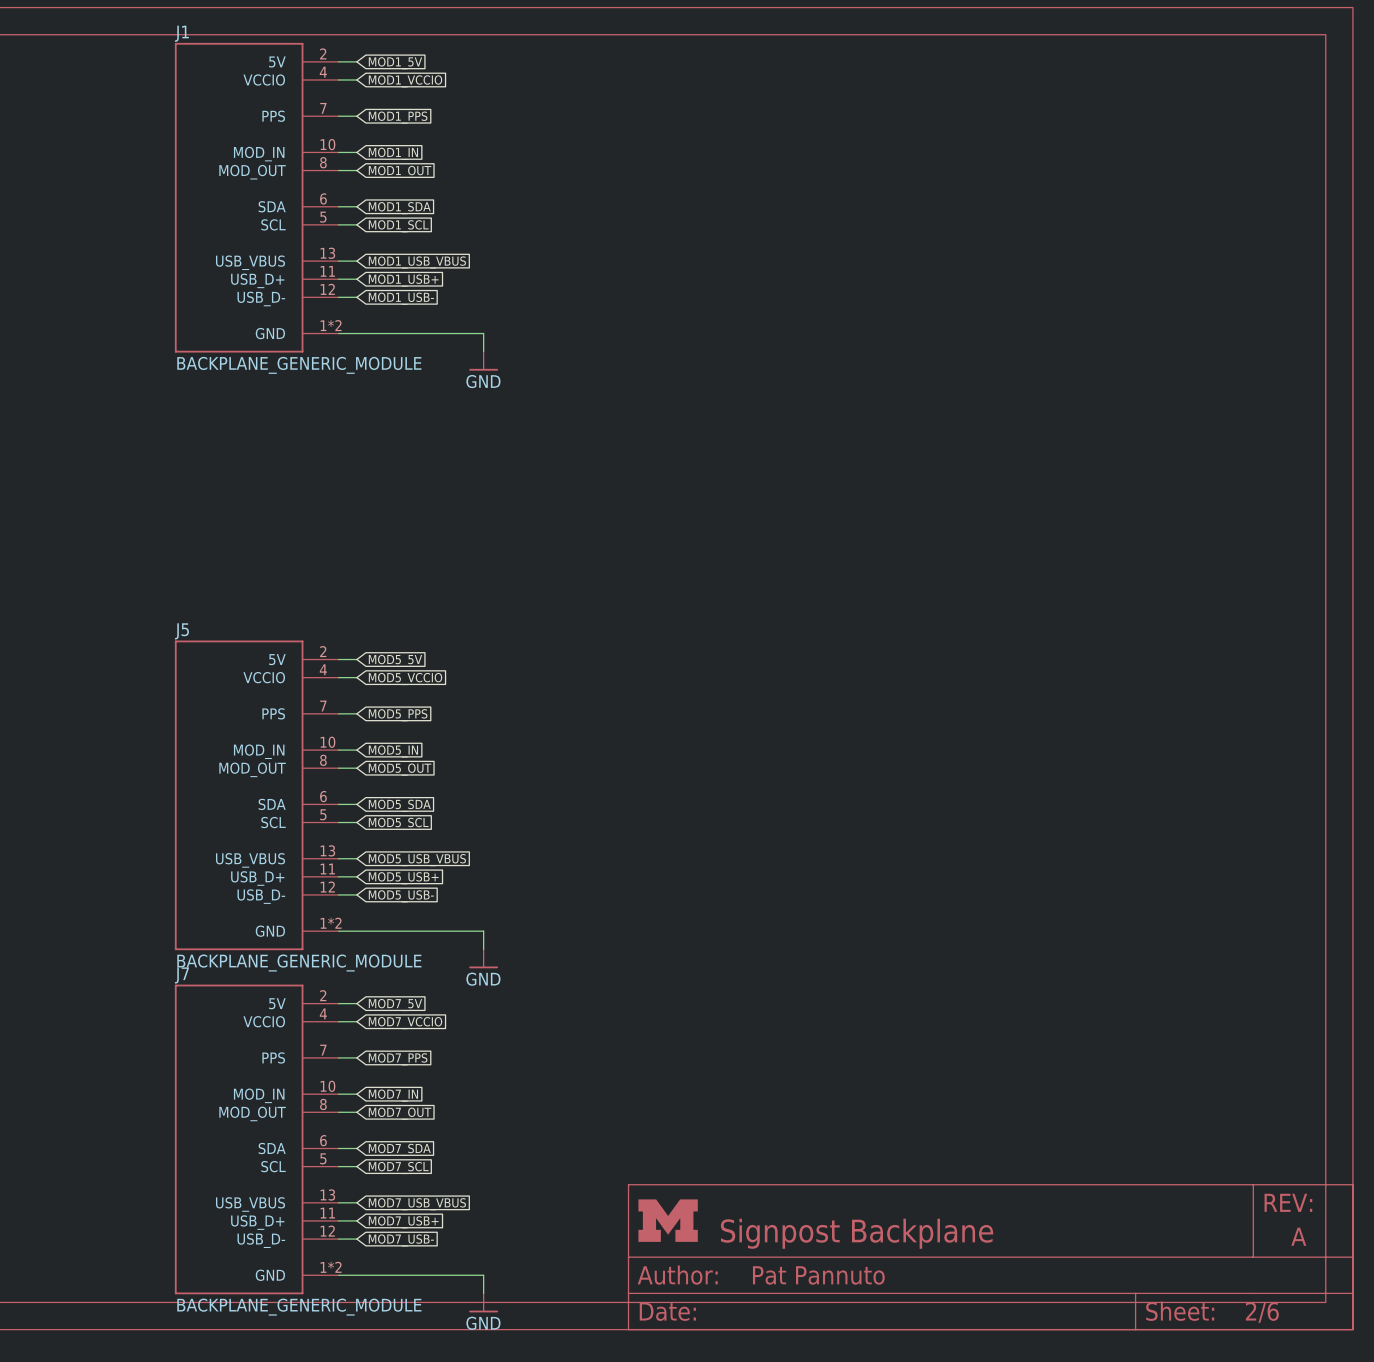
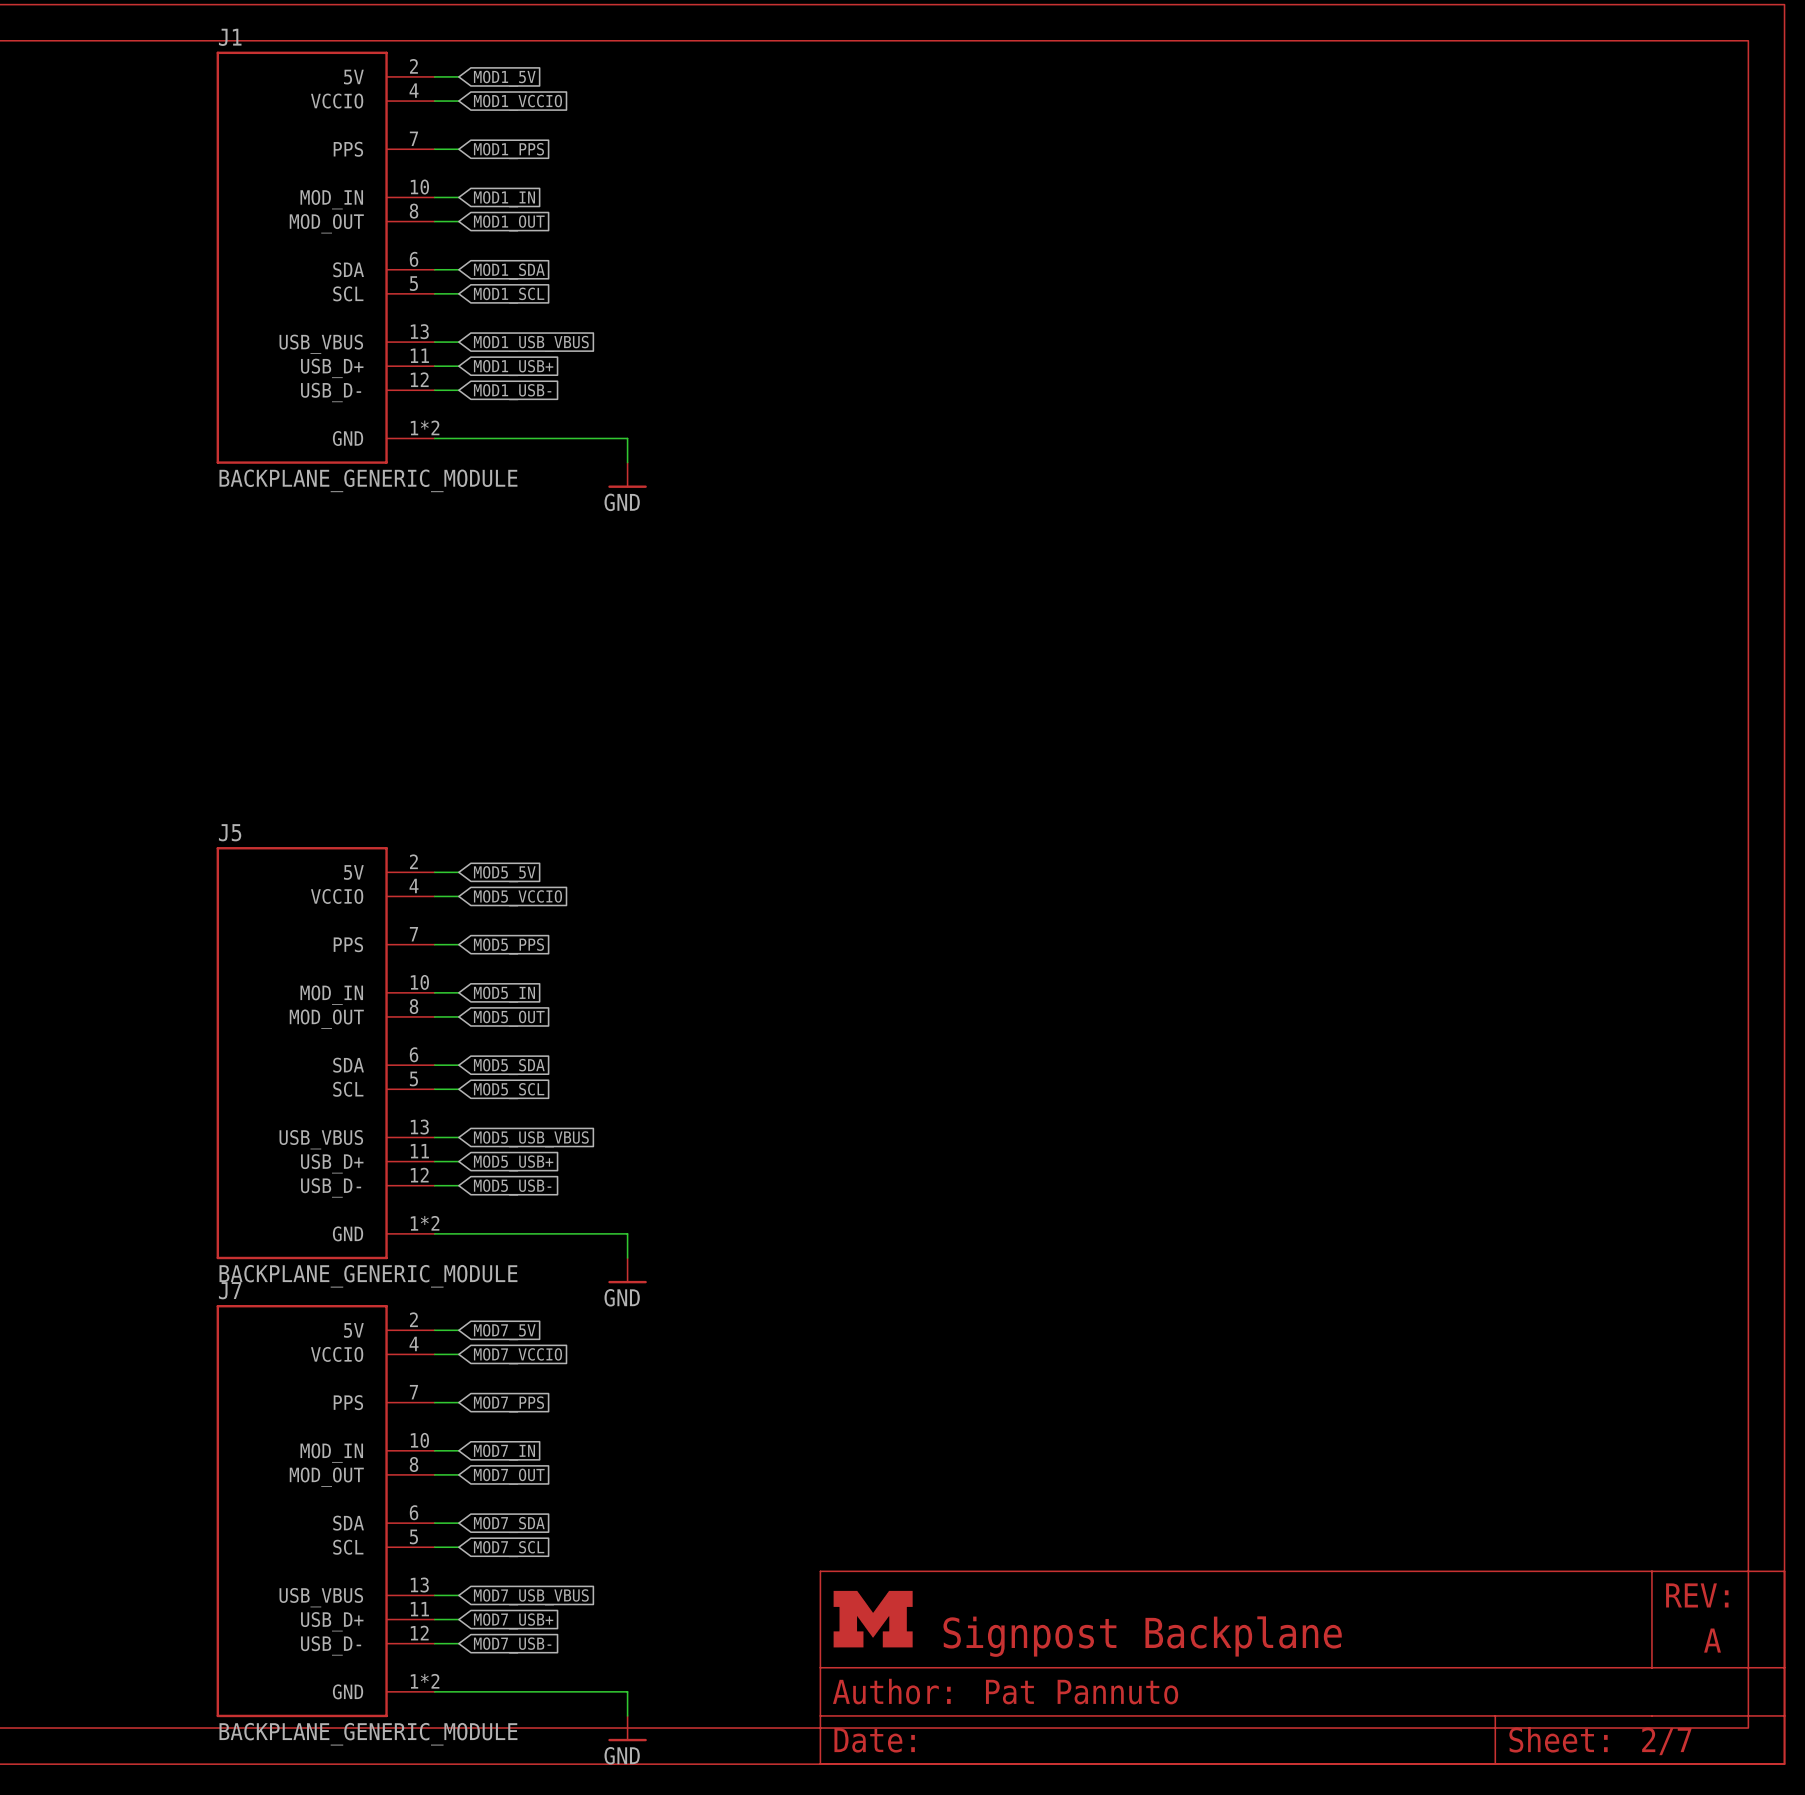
part text: 2/6 (1262, 1312) -> 2/7 (1666, 1741)

